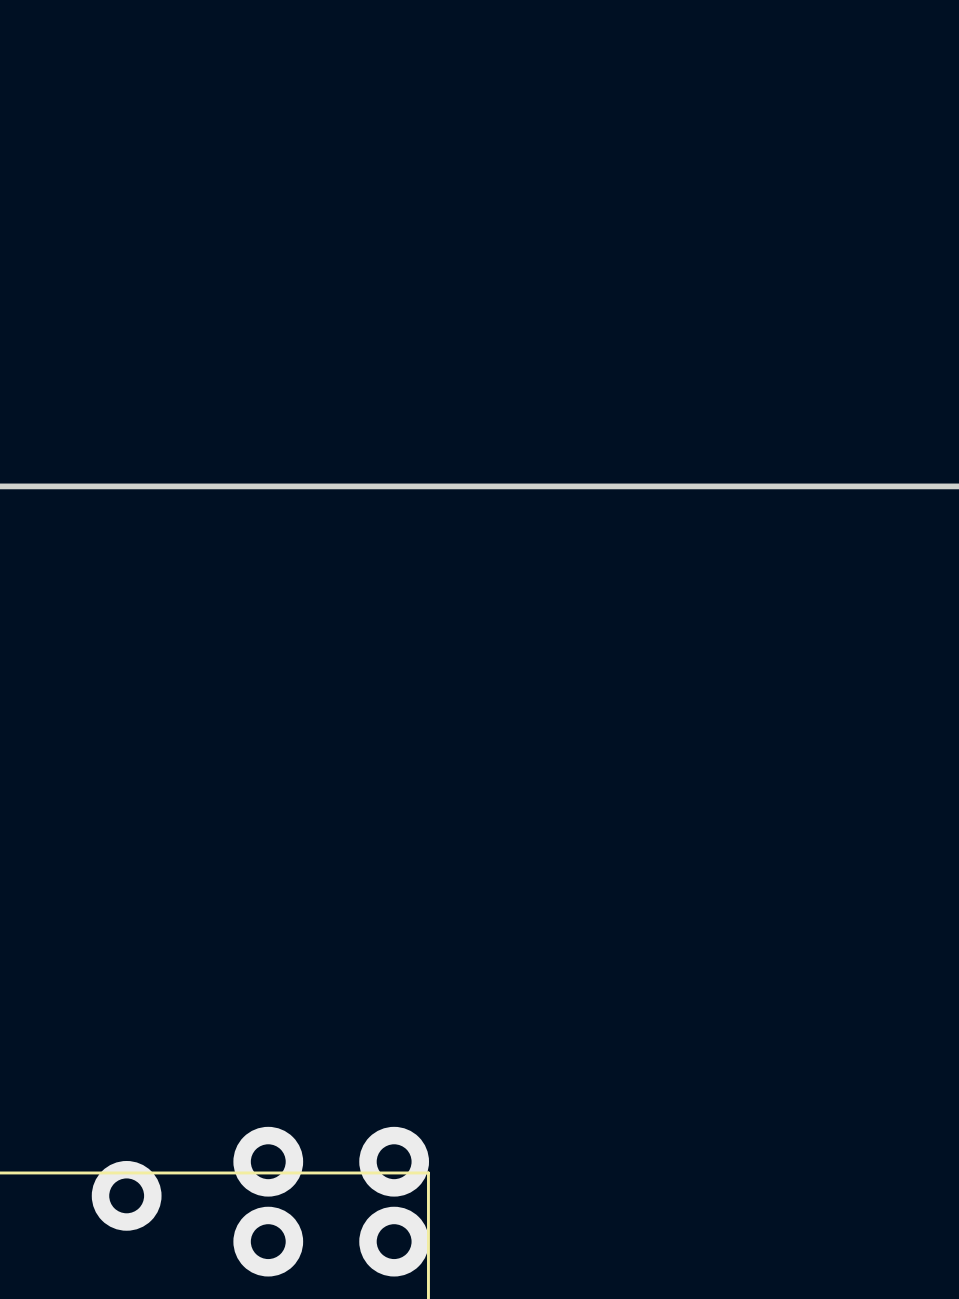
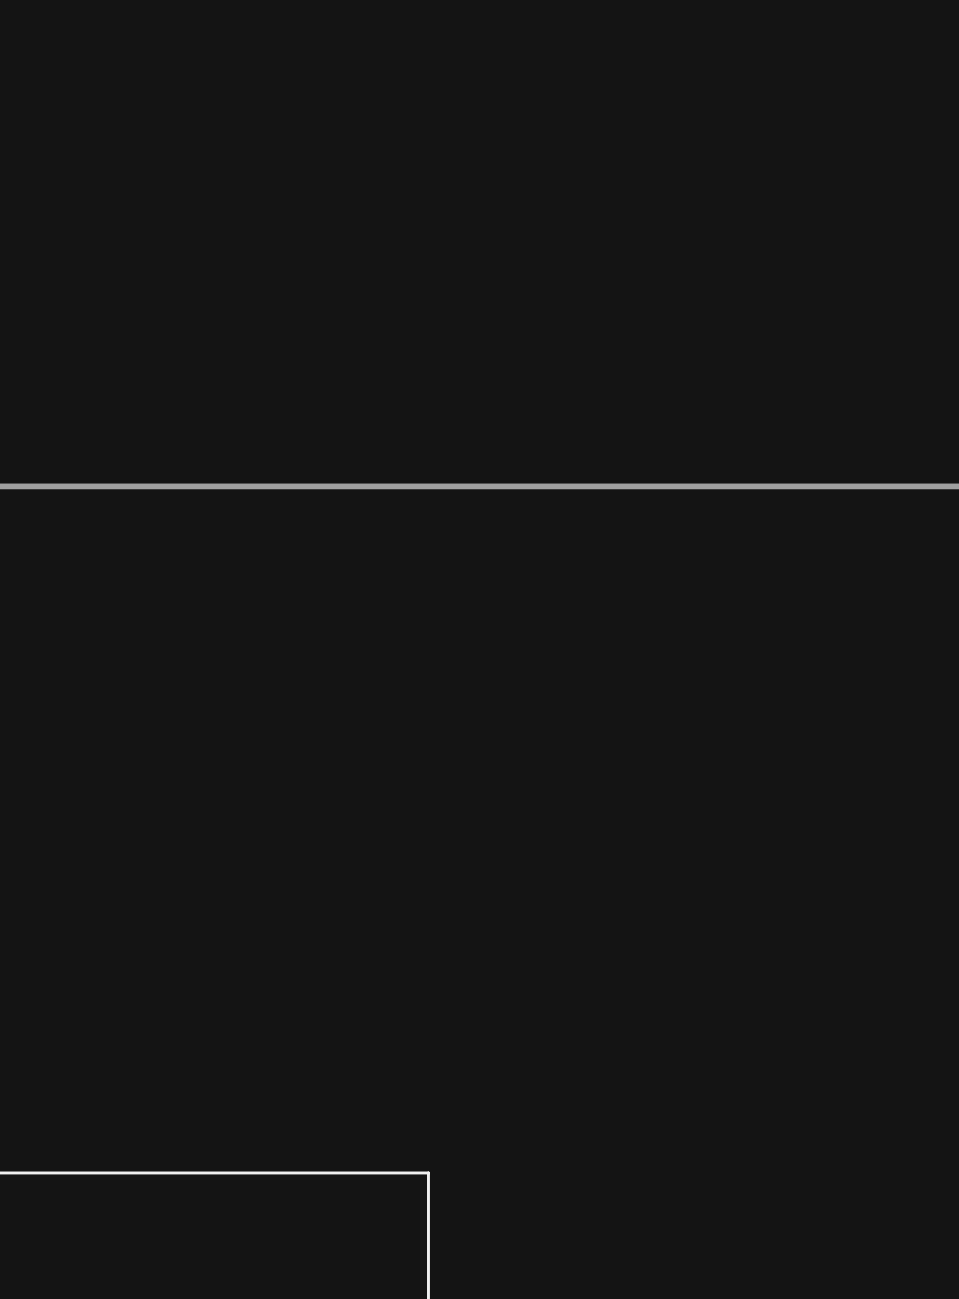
via: (268, 1161) -> none
via: (394, 1161) -> none
via: (126, 1195) -> none
via: (268, 1241) -> none
via: (394, 1241) -> none

